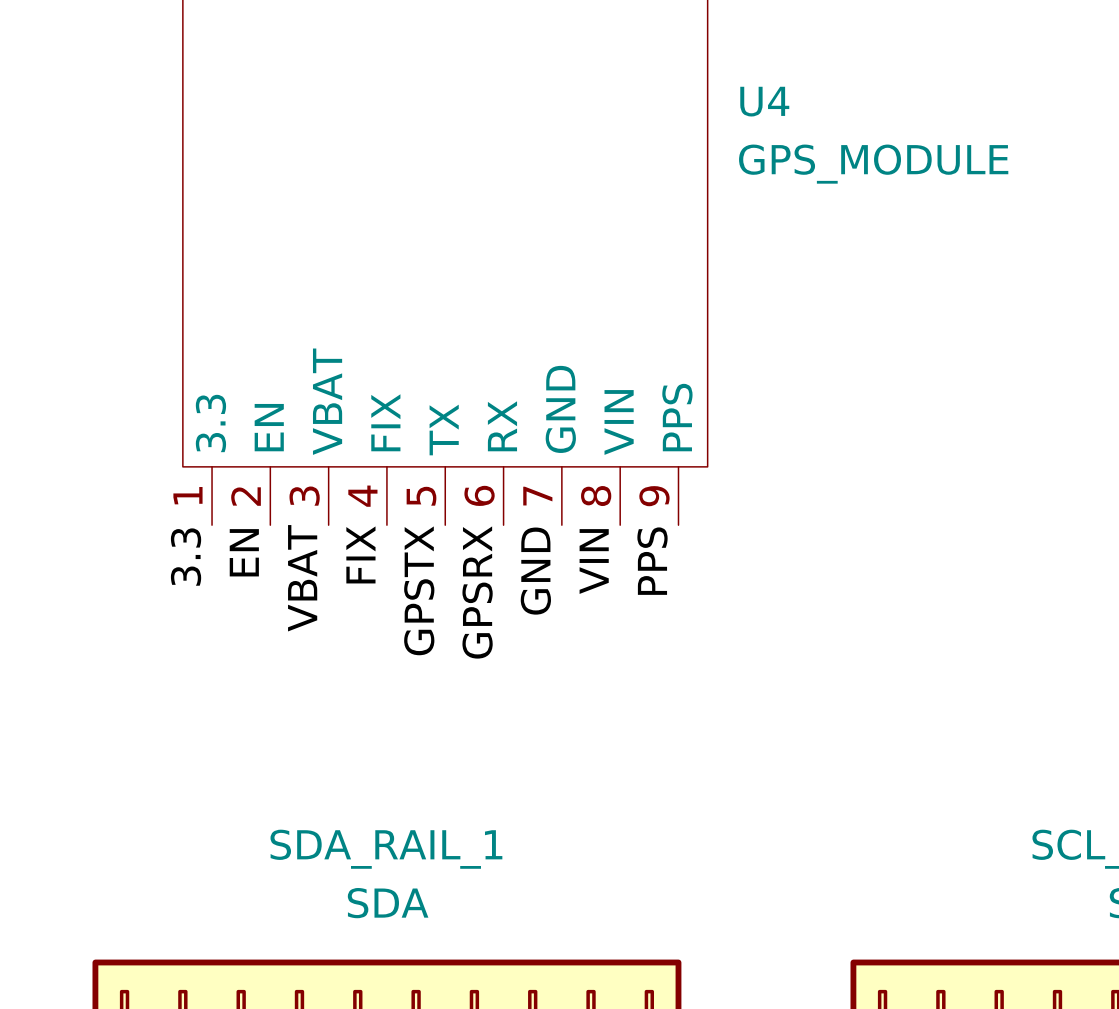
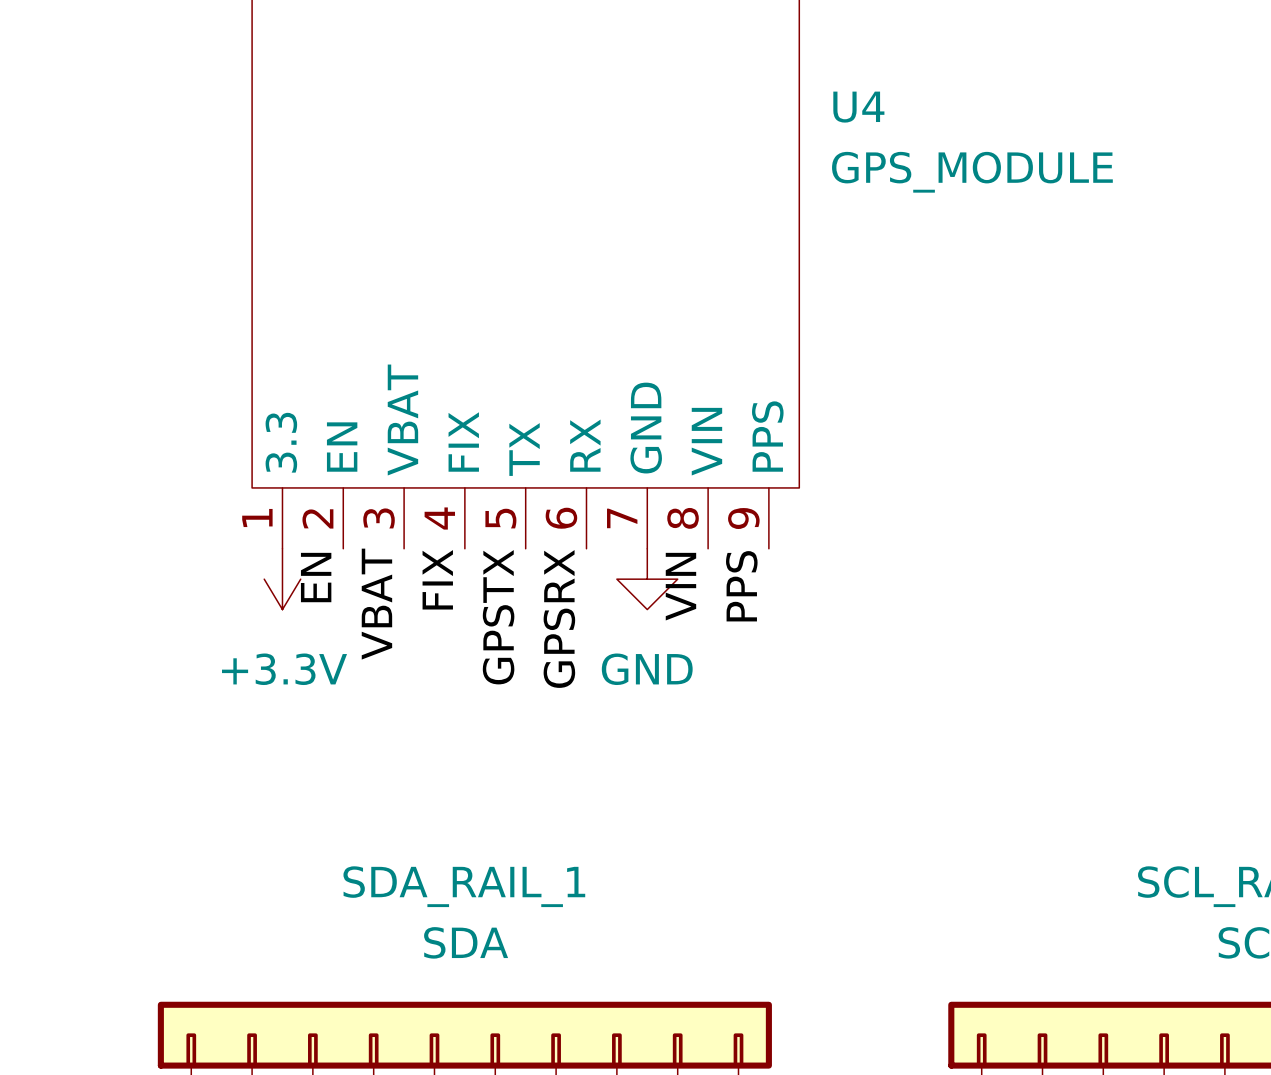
power symbol: none -> +3.3V (282, 579)
power symbol: none -> GND (647, 579)
label: 3.3 (186, 557) -> none
label: GND (535, 571) -> none

